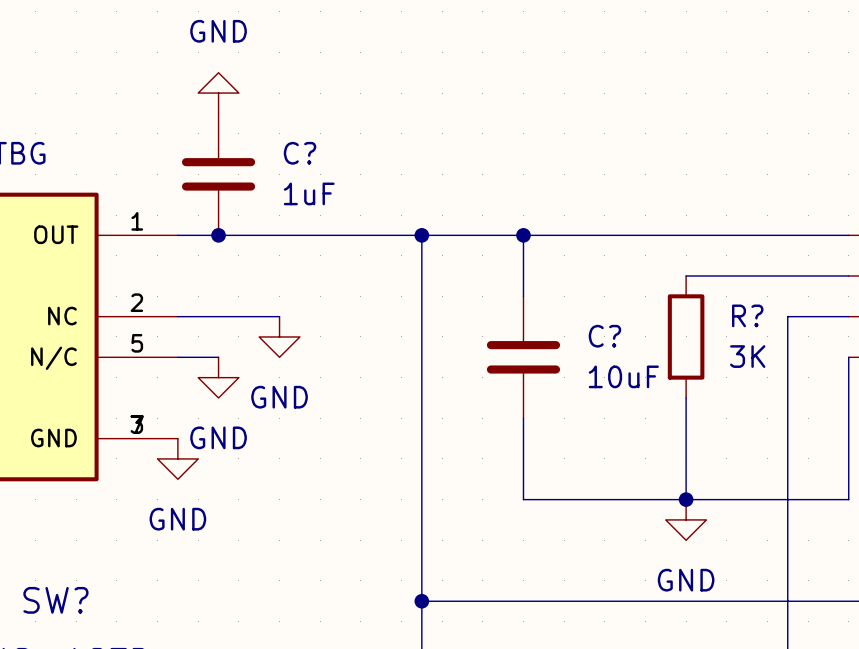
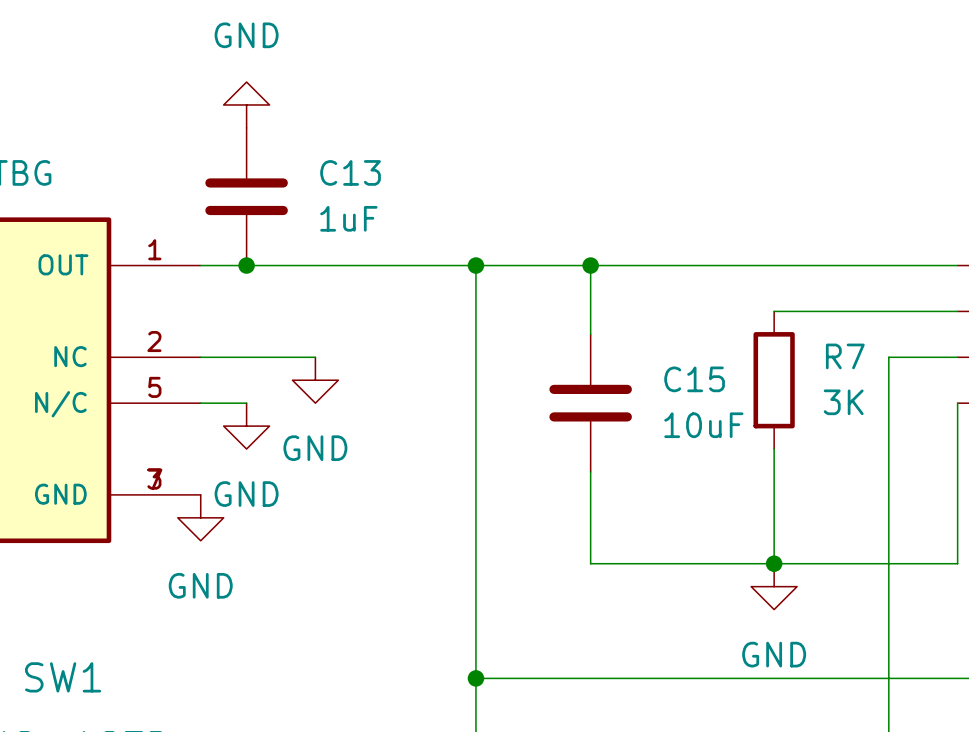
C? name: C? (300, 153) -> C13 (350, 172)
R? name: R? (747, 315) -> R7 (845, 356)
C? name: C? (604, 336) -> C15 (694, 379)
SW? name: SW? (55, 600) -> SW1 (63, 677)

